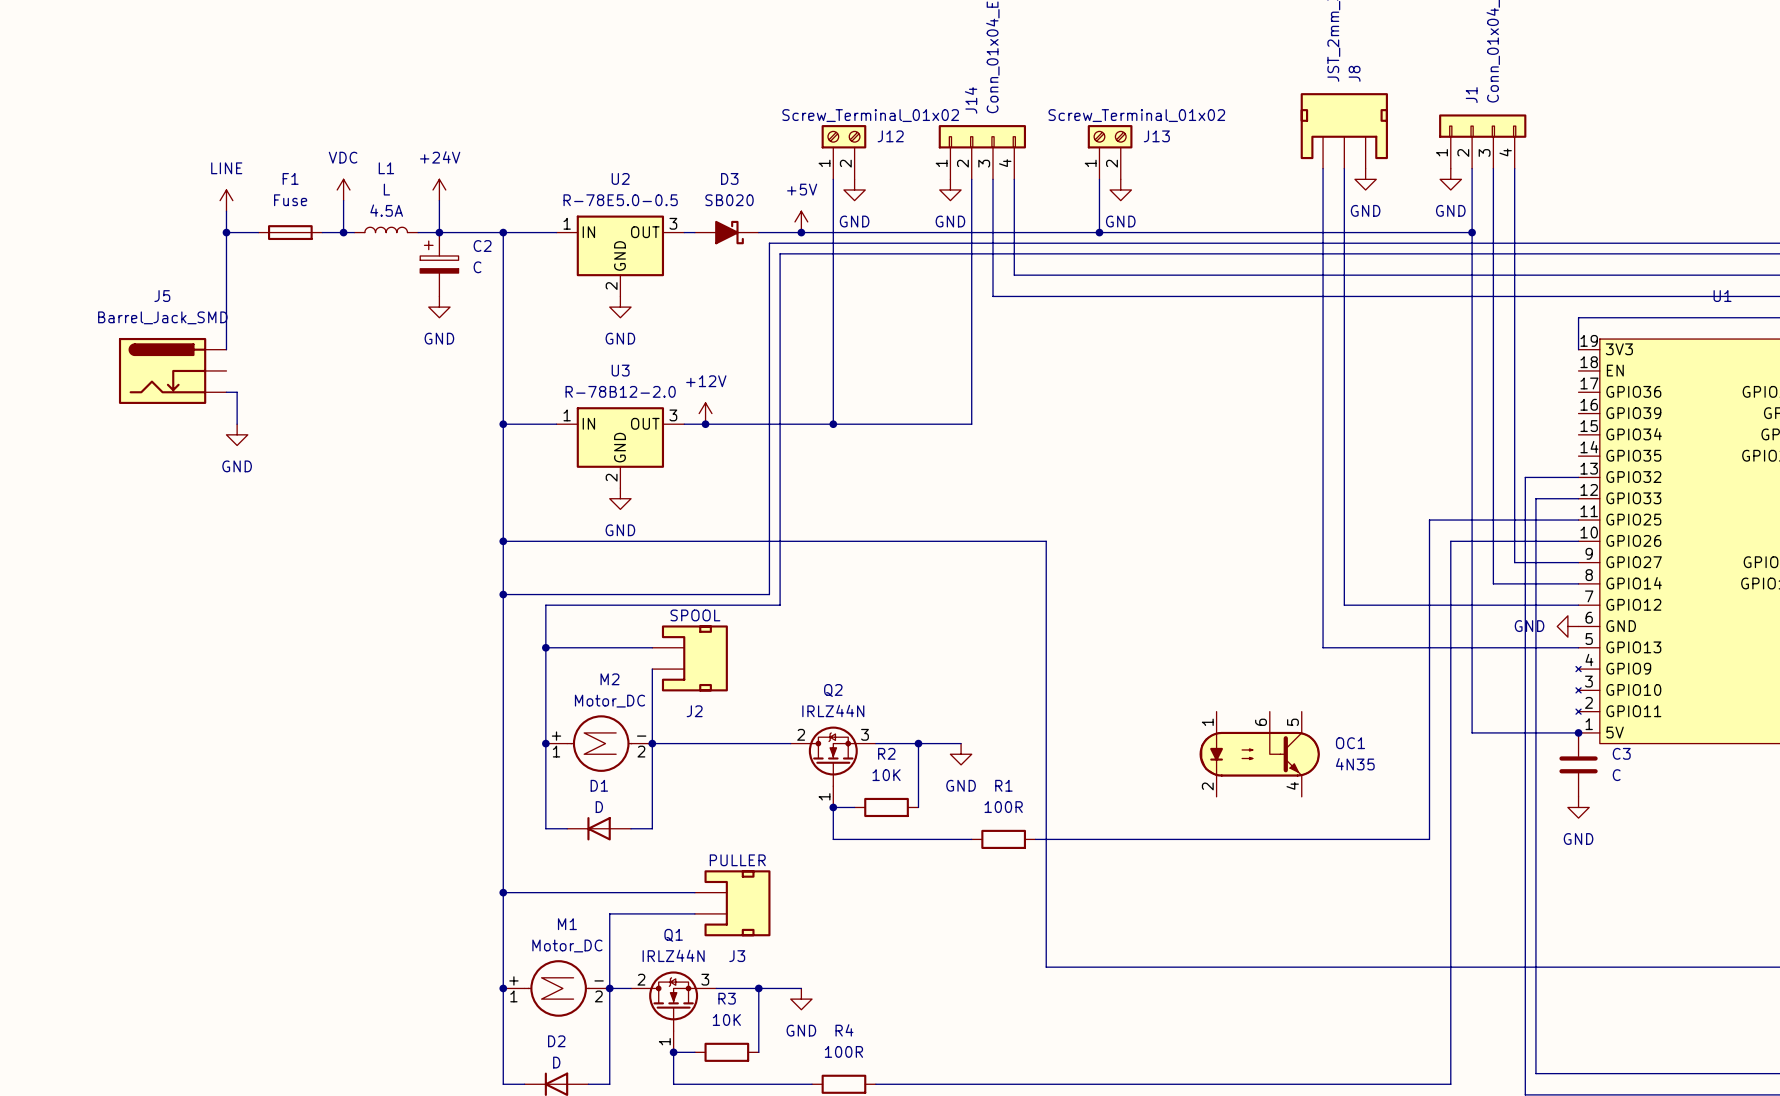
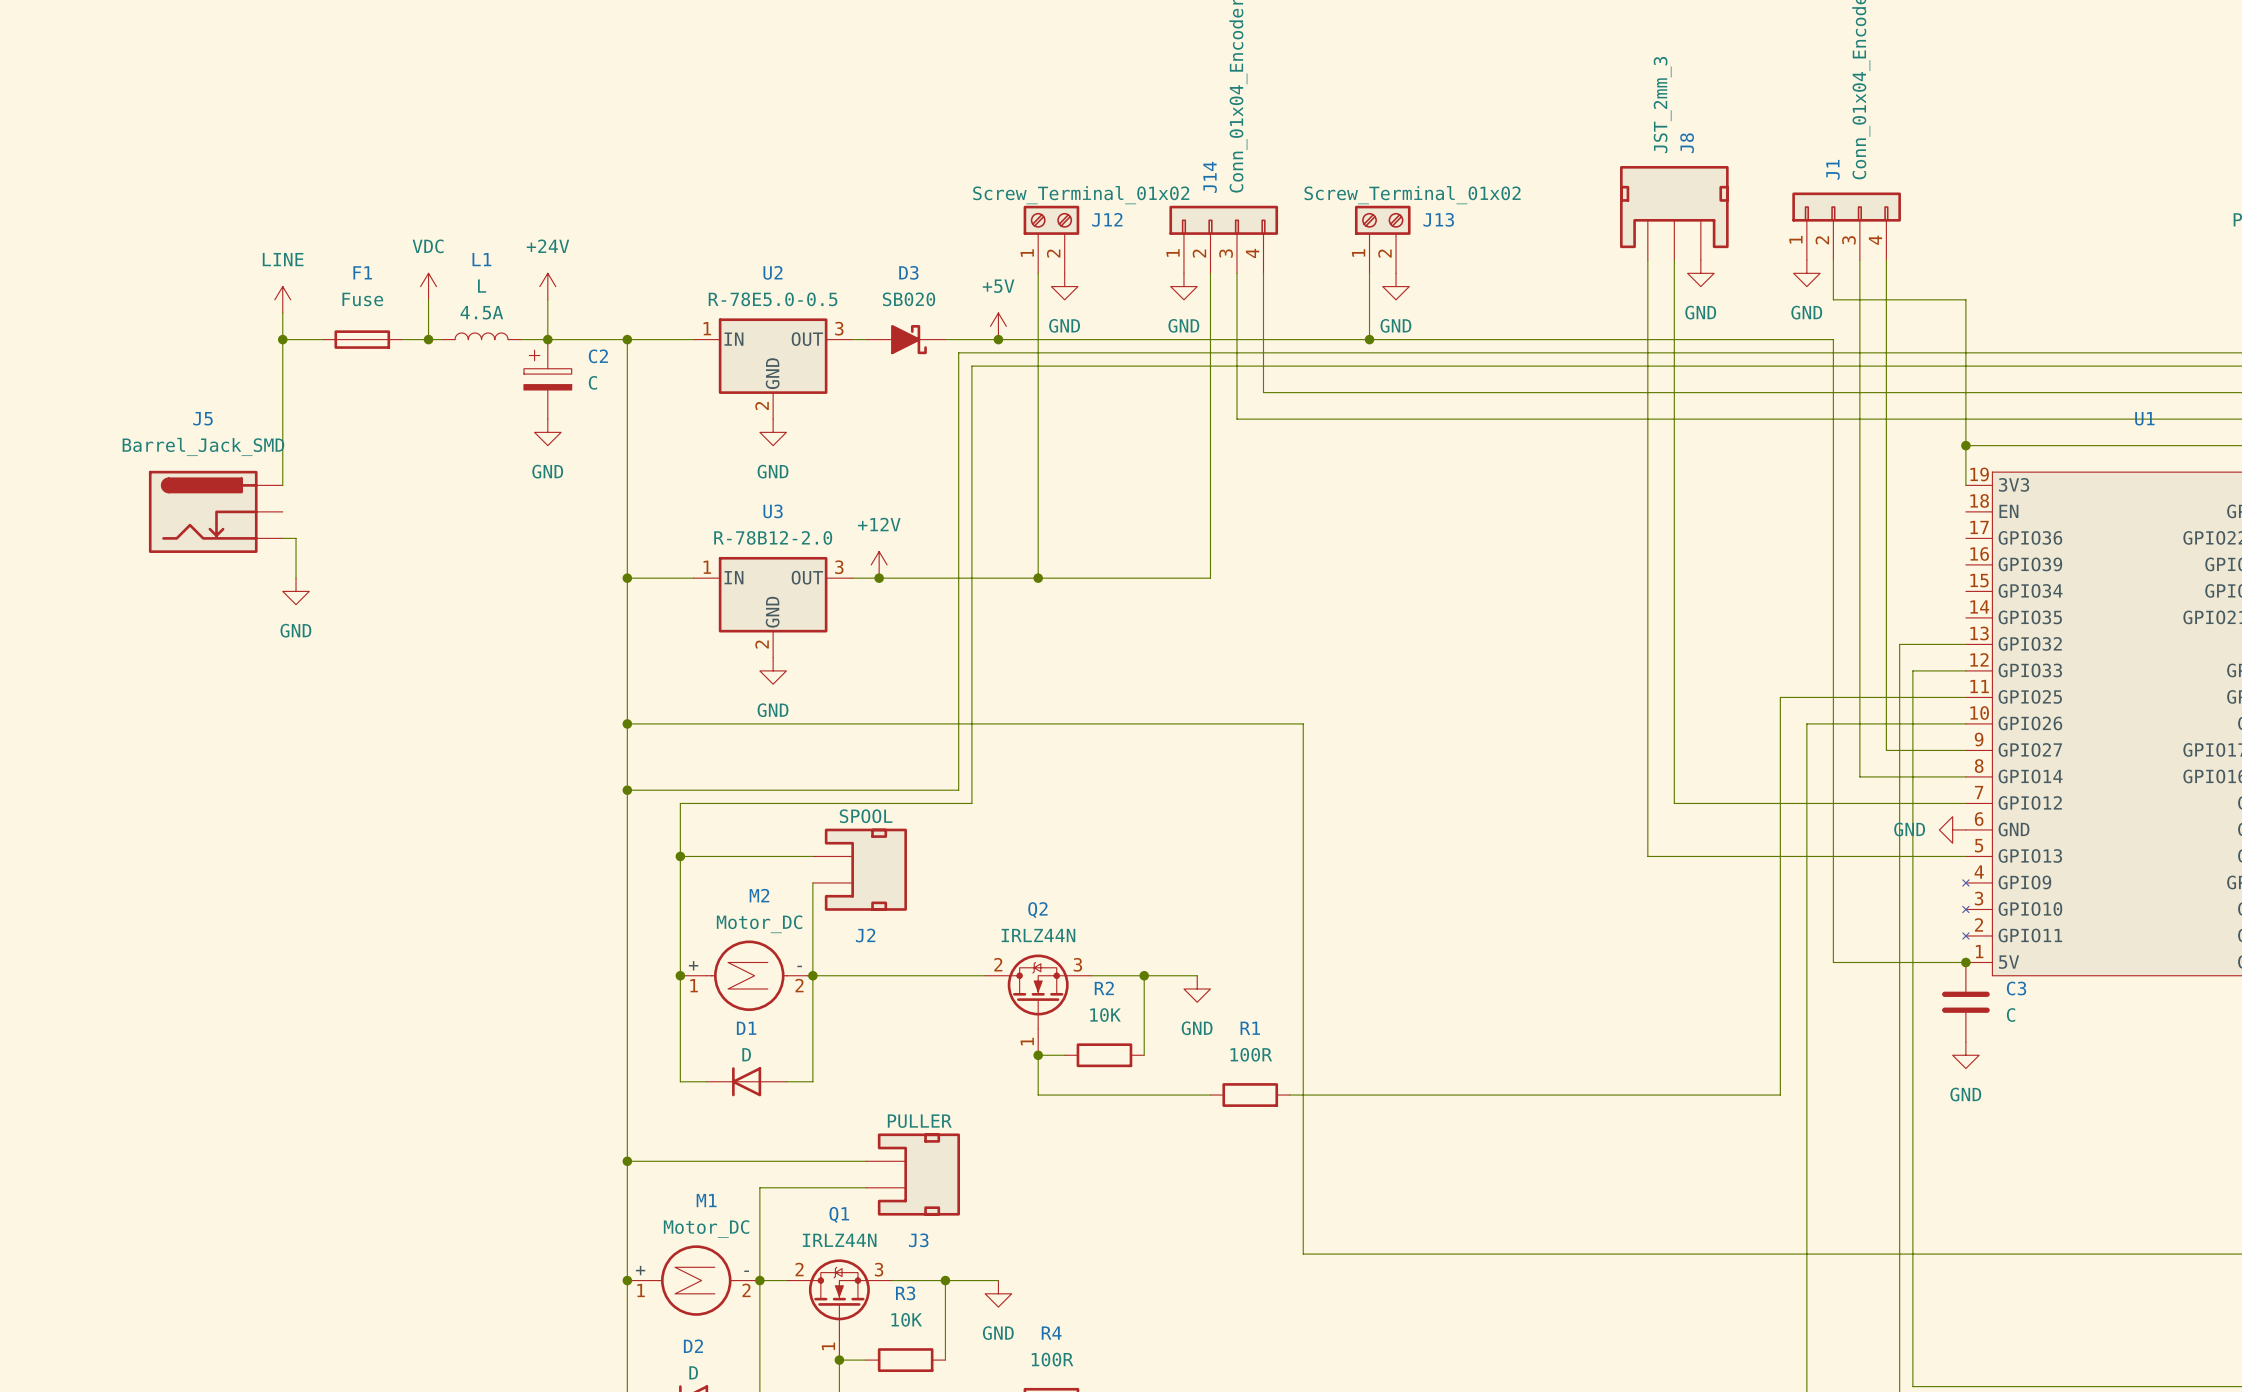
wire: (1472, 200) (1472, 232) -> (1833, 299) (1965, 299) (1965, 445)
junction: (1472, 232) -> none
junction: none -> (1965, 445)
OC1: 4N35 (1259, 754) -> none

